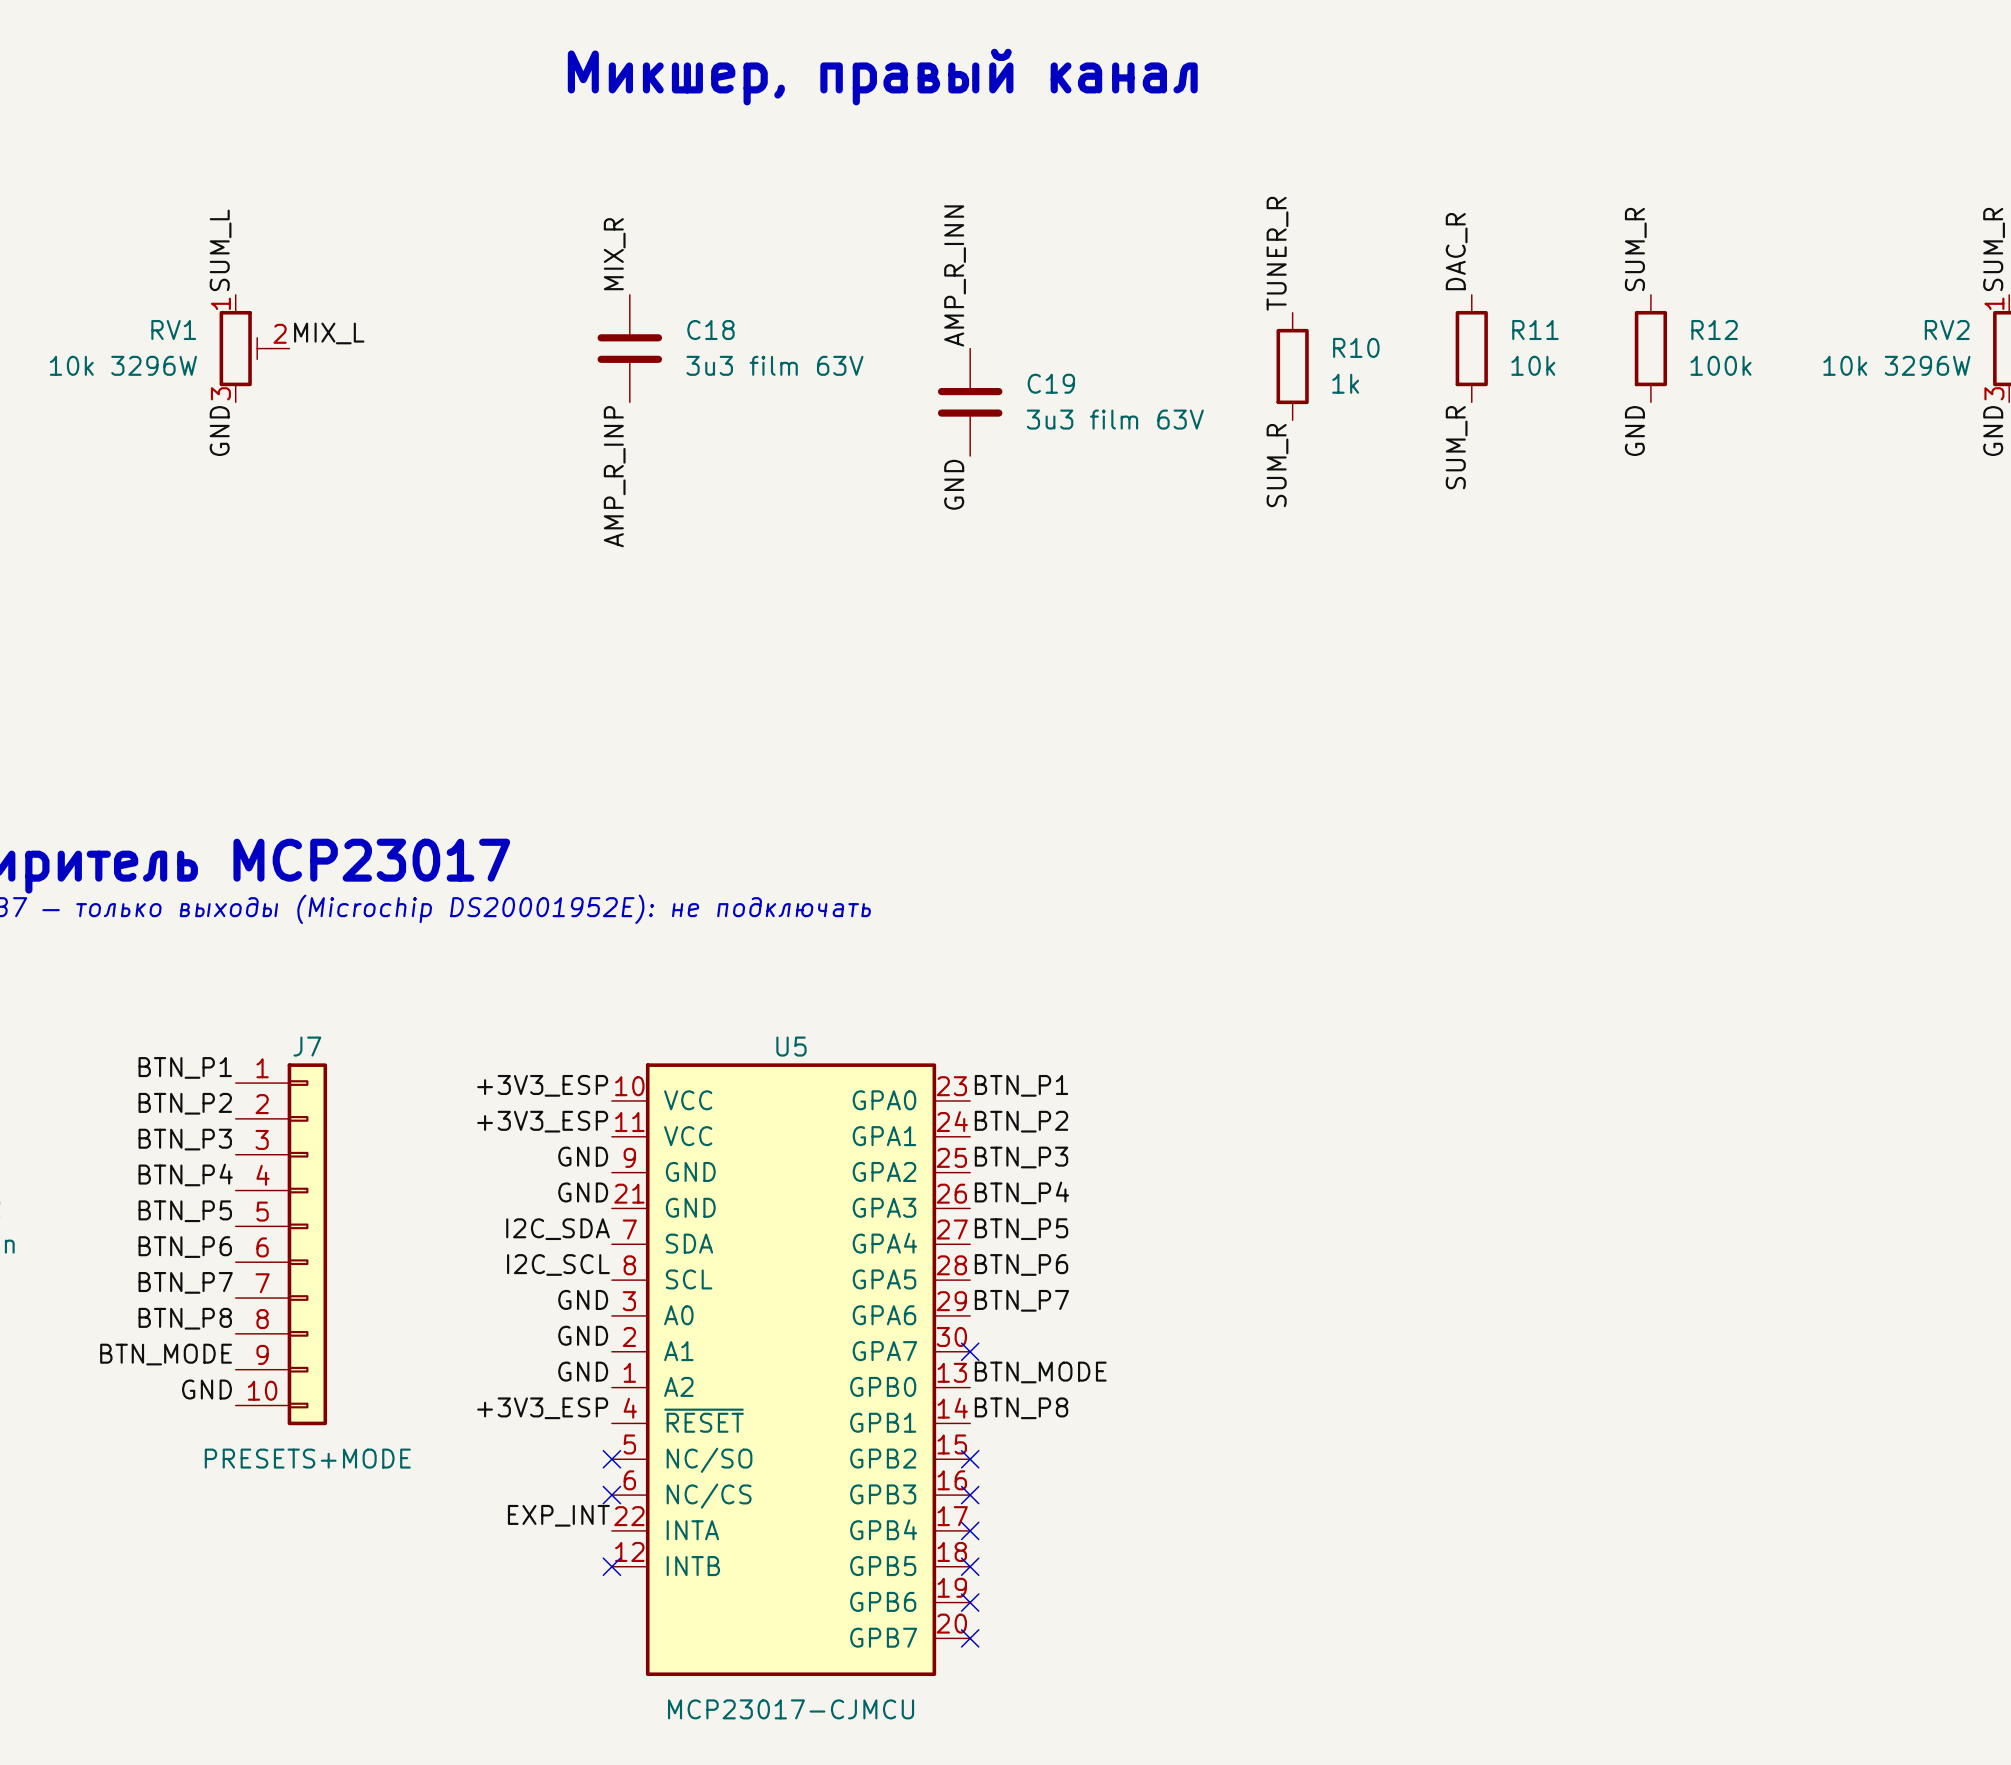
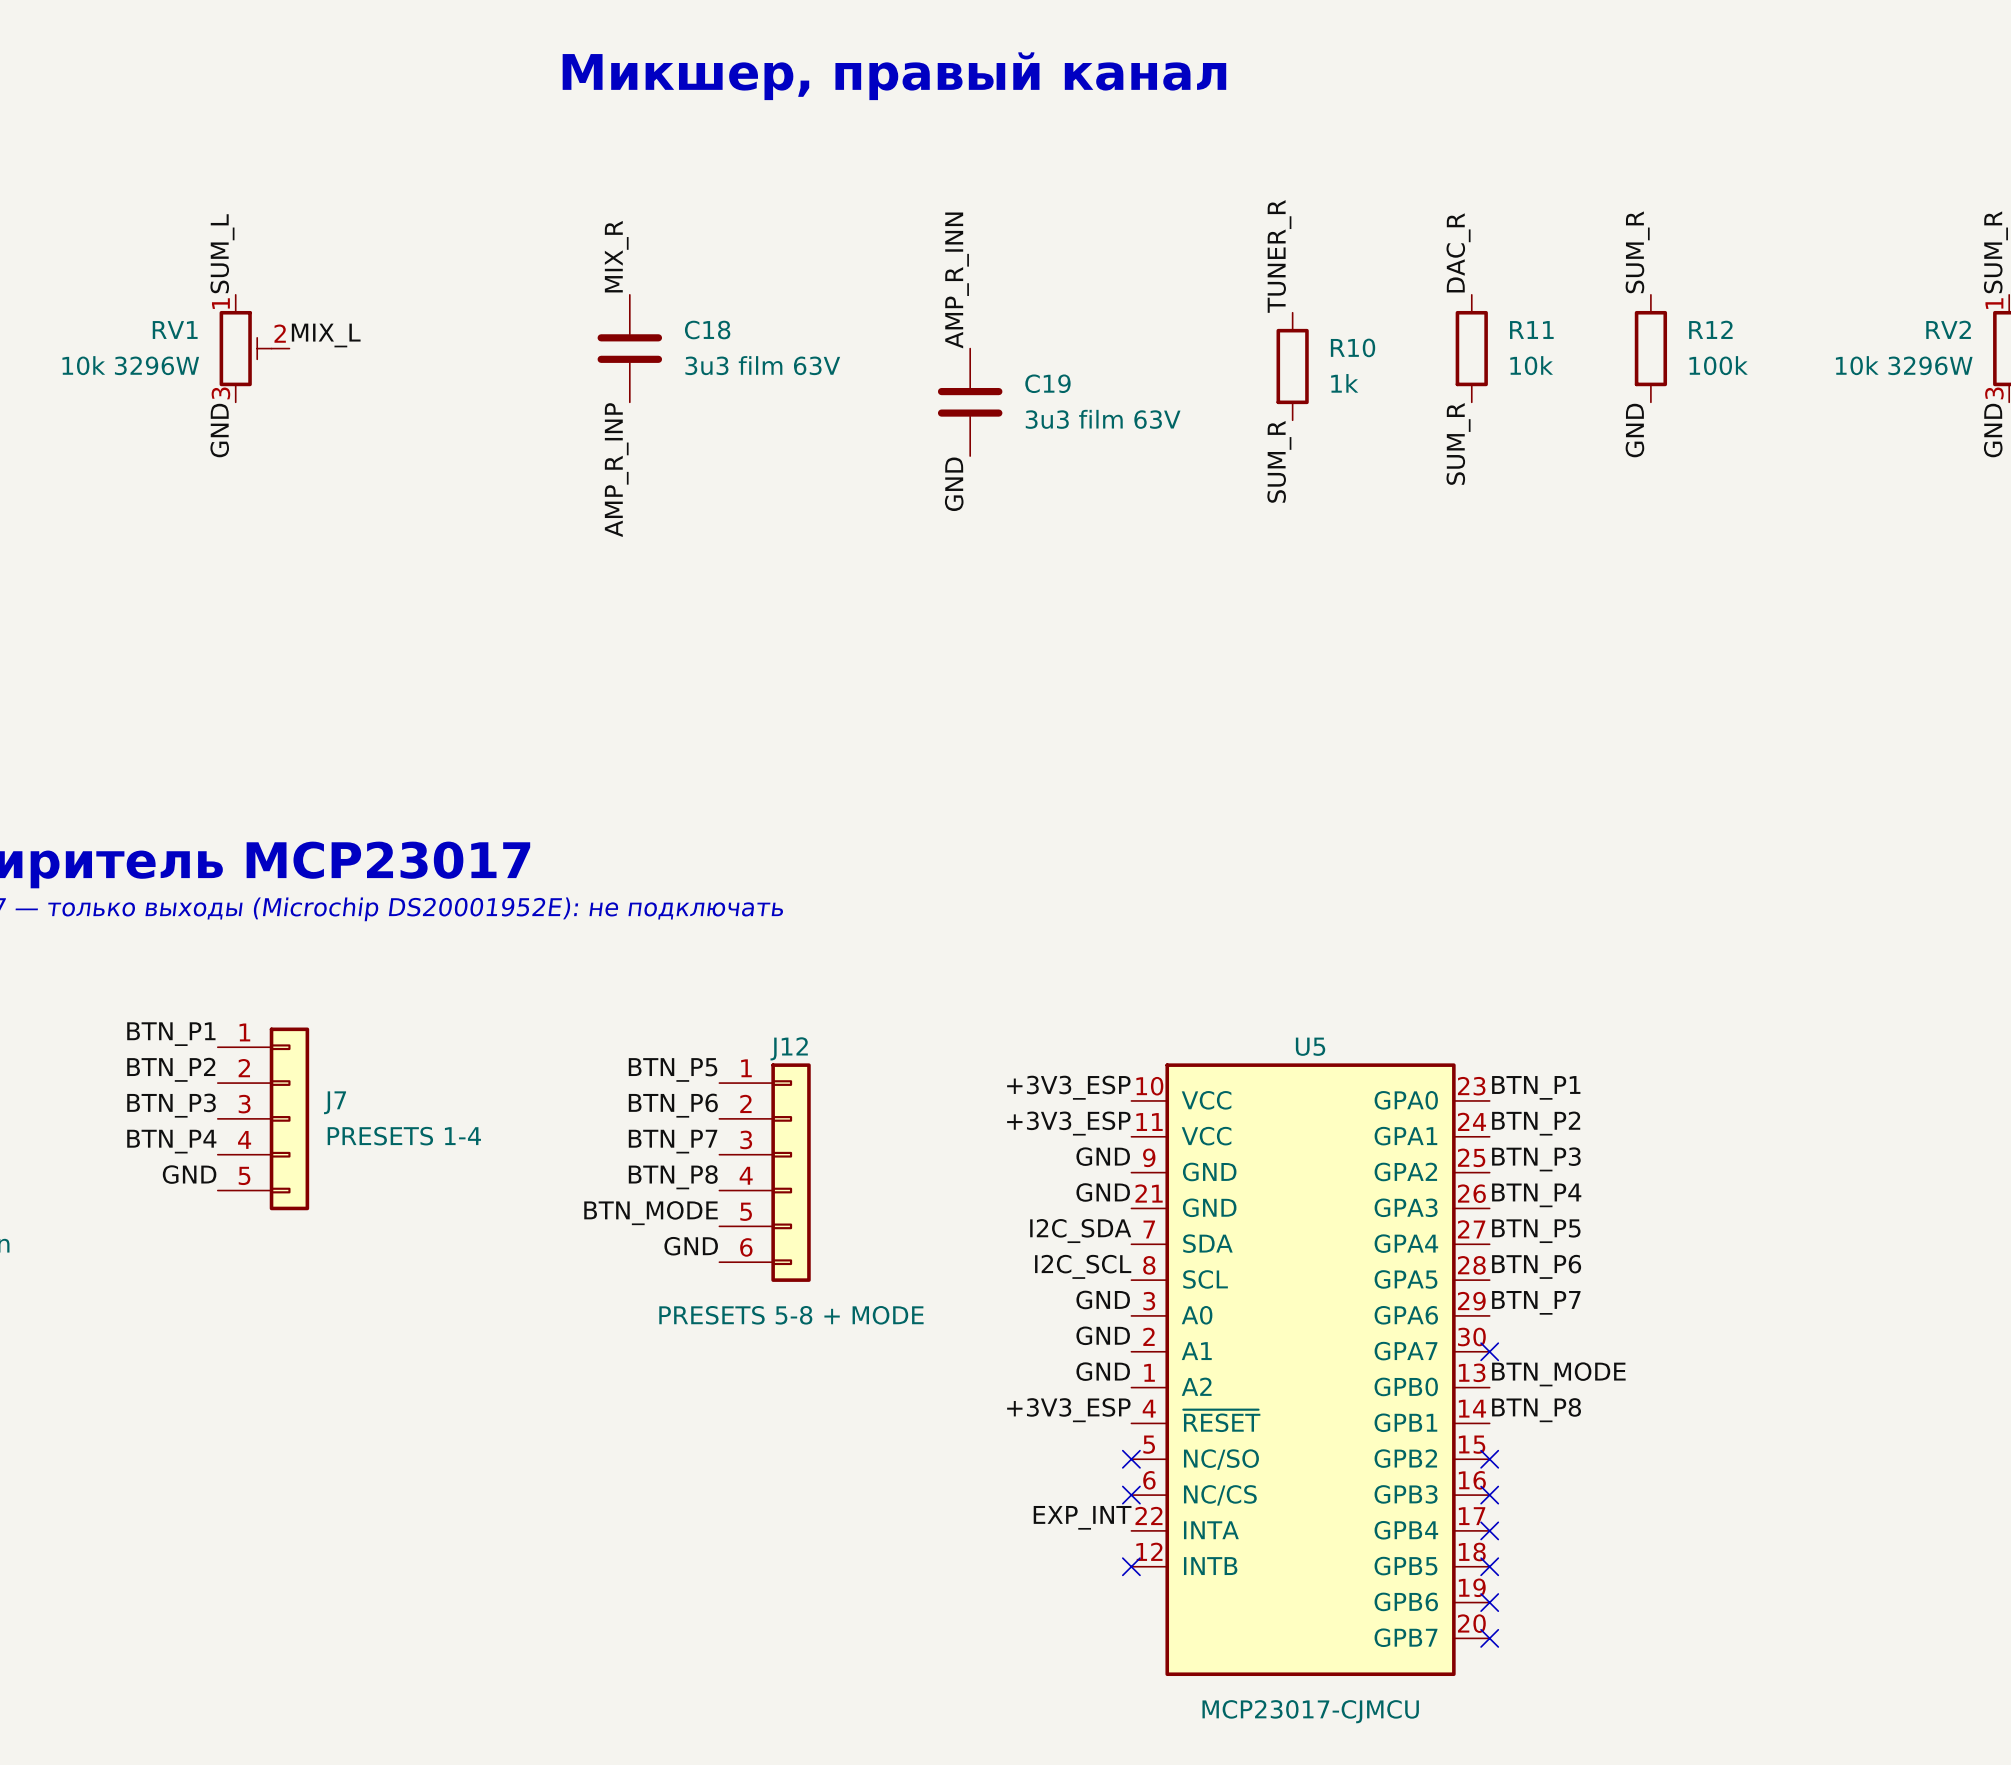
J7 name position: J7 (307, 1046) -> J7 (335, 1102)
J7 symbol: [235, 1063, 328, 1426] -> [217, 1027, 310, 1211]
label position: BTN_P1 (185, 1067) -> BTN_P1 (171, 1034)
label: none -> BTN_P5 (673, 1069)
label: +3V3_ESP (542, 1085) -> none
label: BTN_P1 (1021, 1085) -> none
label: none -> +3V3_ESP (1068, 1087)
label: none -> BTN_P1 (1536, 1087)
label position: BTN_P2 (185, 1103) -> BTN_P2 (171, 1069)
label: none -> BTN_P6 (673, 1105)
label: +3V3_ESP (542, 1121) -> none
label: BTN_P2 (1021, 1121) -> none
label: none -> +3V3_ESP (1068, 1123)
label: none -> BTN_P2 (1536, 1123)
label position: BTN_P3 (185, 1139) -> BTN_P3 (171, 1105)
label: none -> BTN_P7 (673, 1141)
label: GND (583, 1156) -> none
label: none -> GND (1103, 1156)
label: BTN_P3 (1021, 1157) -> none
label: none -> BTN_P3 (1536, 1159)
J12: none -> PRESETS 5-8 + MODE (765, 1172)
label position: BTN_P4 (185, 1174) -> BTN_P4 (171, 1141)
label: none -> GND (189, 1174)
label: none -> BTN_P8 (673, 1177)
label: GND (583, 1192) -> none
label: BTN_P4 (1021, 1192) -> none
label: none -> GND (1103, 1192)
label: none -> BTN_P4 (1536, 1195)
label: BTN_P5 (185, 1211) -> none
label: none -> BTN_MODE (651, 1213)
label: I2C_SDA (558, 1229) -> none
label: BTN_P5 (1021, 1229) -> none
label: none -> I2C_SDA (1080, 1231)
label: none -> BTN_P5 (1536, 1231)
label: none -> GND (691, 1246)
label: BTN_P6 (185, 1247) -> none
label: I2C_SCL (558, 1264) -> none
label: BTN_P6 (1021, 1264) -> none
label: none -> I2C_SCL (1083, 1266)
label: none -> BTN_P6 (1536, 1266)
label: BTN_P7 (185, 1282) -> none
label: GND (583, 1299) -> none
label: none -> GND (1103, 1299)
label: BTN_P7 (1021, 1300) -> none
label: none -> BTN_P7 (1536, 1302)
label: BTN_P8 (185, 1318) -> none
label: GND (583, 1335) -> none
label: none -> GND (1103, 1335)
no-connect mark: (970, 1351) -> none
no-connect mark: none -> (1489, 1351)
label: BTN_MODE (166, 1354) -> none
U5 position: (791, 1369) -> (1310, 1369)
label: GND (583, 1371) -> none
label: none -> GND (1103, 1371)
label: BTN_MODE (1040, 1372) -> none
label: none -> BTN_MODE (1558, 1374)
label: GND (206, 1389) -> none
label: +3V3_ESP (542, 1408) -> none
label: BTN_P8 (1021, 1408) -> none
label: none -> +3V3_ESP (1068, 1410)
label: none -> BTN_P8 (1536, 1410)
J7 value: PRESETS+MODE (307, 1458) -> PRESETS 1-4 (404, 1136)
no-connect mark: (611, 1459) -> none
no-connect mark: (970, 1459) -> none
no-connect mark: none -> (1131, 1459)
no-connect mark: none -> (1489, 1459)
no-connect mark: (611, 1495) -> none
no-connect mark: (970, 1495) -> none
no-connect mark: none -> (1131, 1495)
no-connect mark: none -> (1489, 1495)
label: EXP_INT (558, 1515) -> none
label: none -> EXP_INT (1082, 1517)
no-connect mark: (970, 1530) -> none
no-connect mark: none -> (1489, 1530)
no-connect mark: (611, 1566) -> none
no-connect mark: (970, 1566) -> none
no-connect mark: none -> (1131, 1566)
no-connect mark: none -> (1489, 1566)
no-connect mark: (970, 1602) -> none
no-connect mark: none -> (1489, 1602)
no-connect mark: (970, 1638) -> none
no-connect mark: none -> (1489, 1638)

